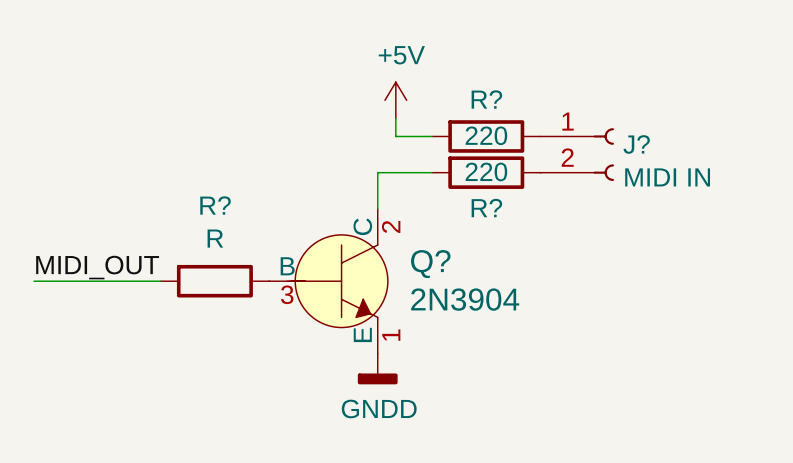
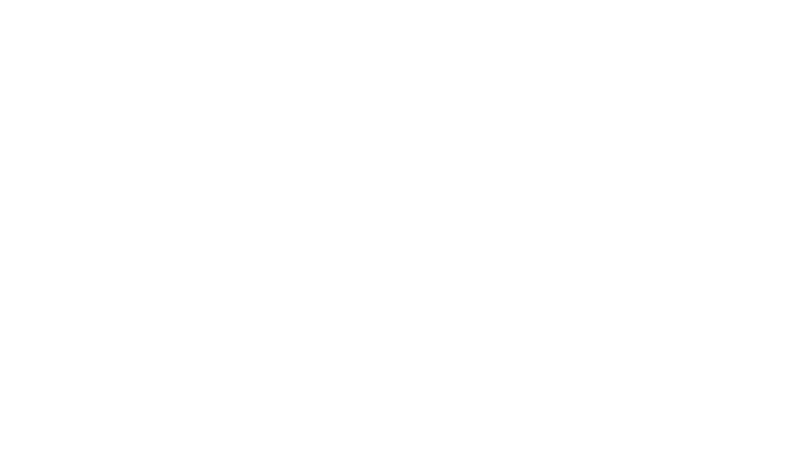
power symbol: +5V (395, 100) -> none
wire: (395, 118) (395, 136) (432, 136) -> none
R?: 220 (486, 136) -> none
J?: MIDI IN (577, 154) -> none
wire: (432, 172) (377, 172) (377, 208) -> none
R?: 220 (486, 172) -> none
label: MIDI_OUT (97, 267) -> none
wire: (34, 281) (160, 281) -> none
R?: R (214, 281) -> none
Q?: 2N3904 (328, 281) -> none
power symbol: GNDD (377, 368) -> none

